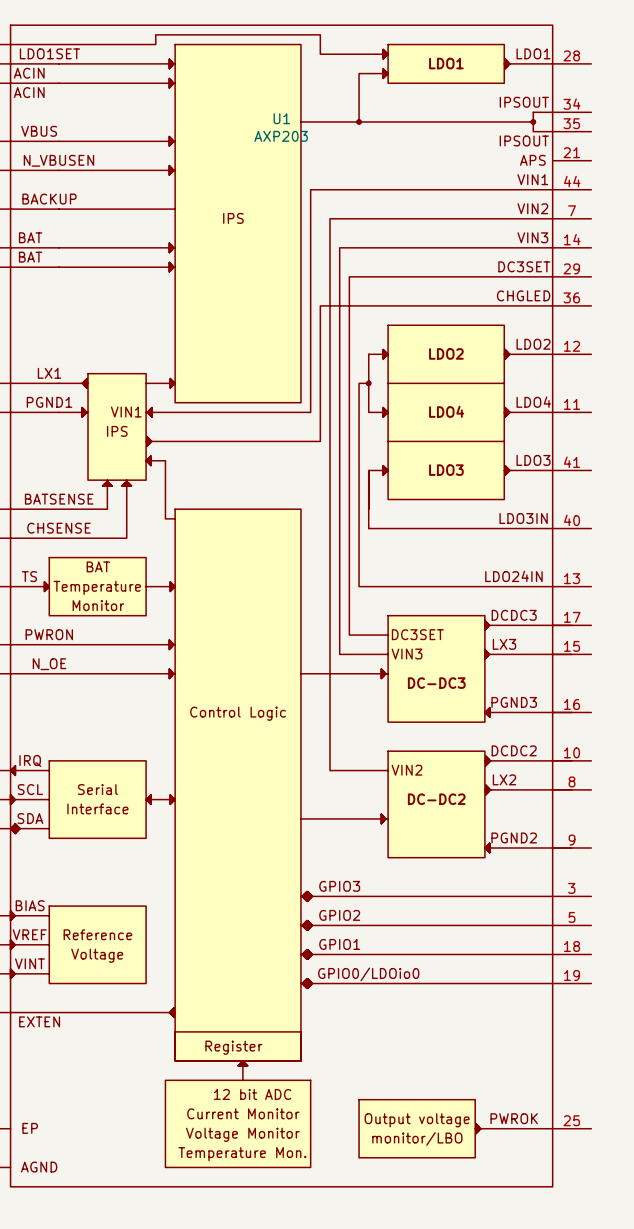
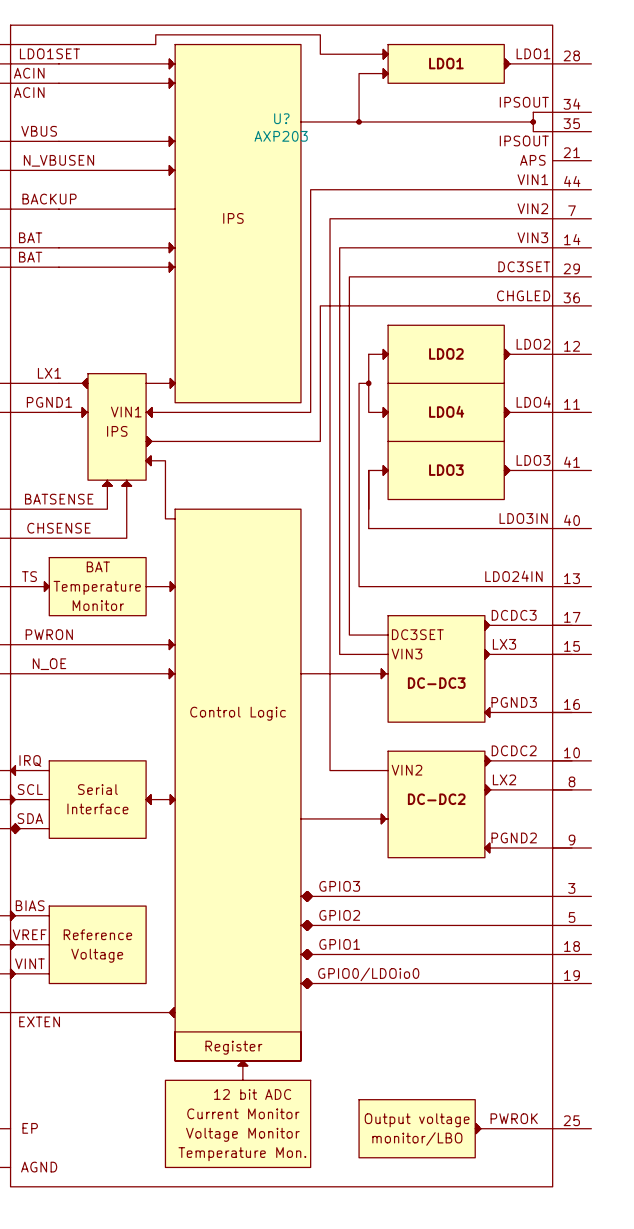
U1 name: U1 (281, 118) -> U? (281, 118)

